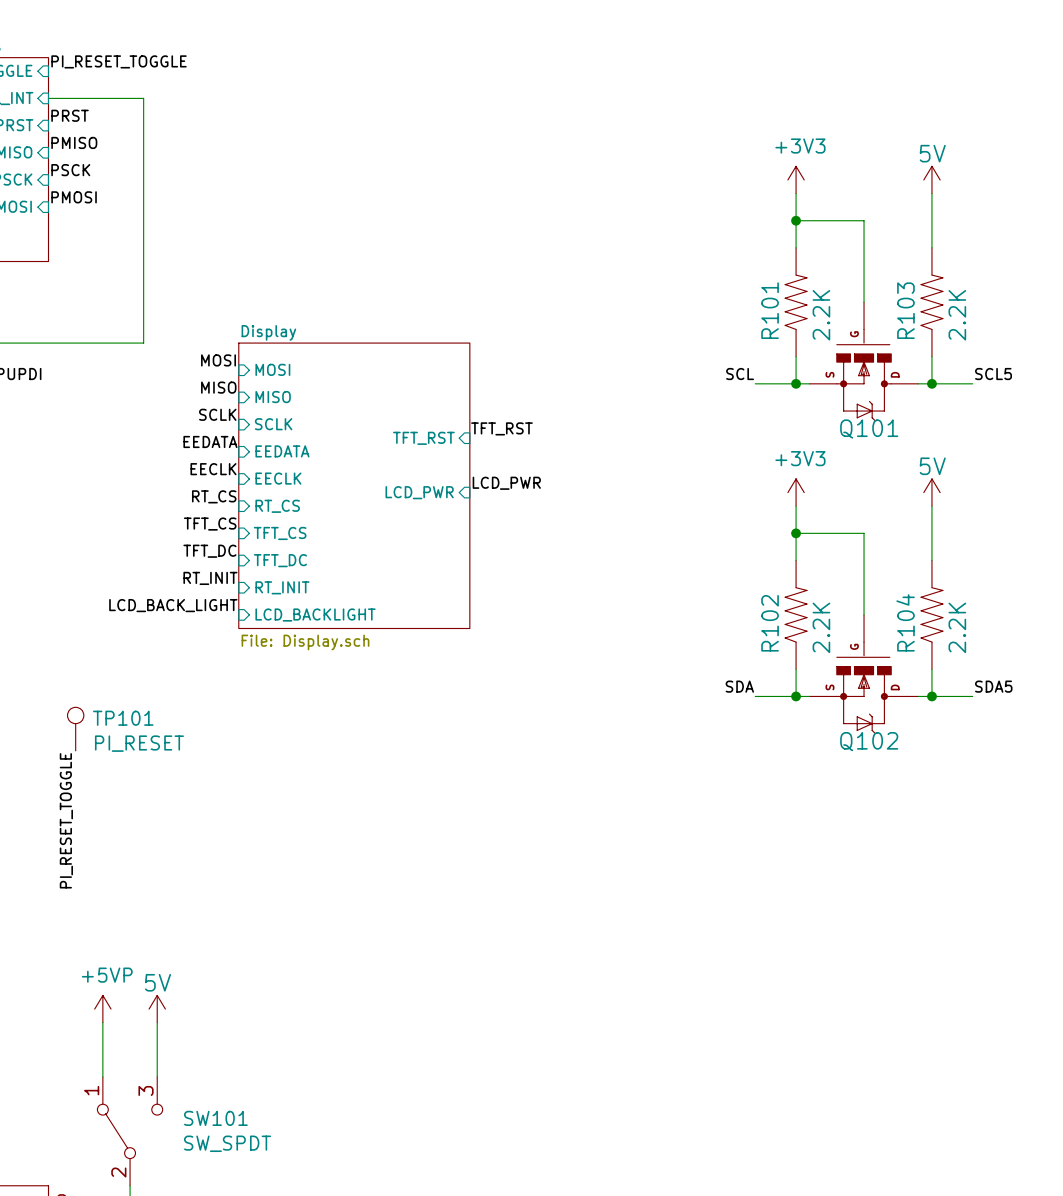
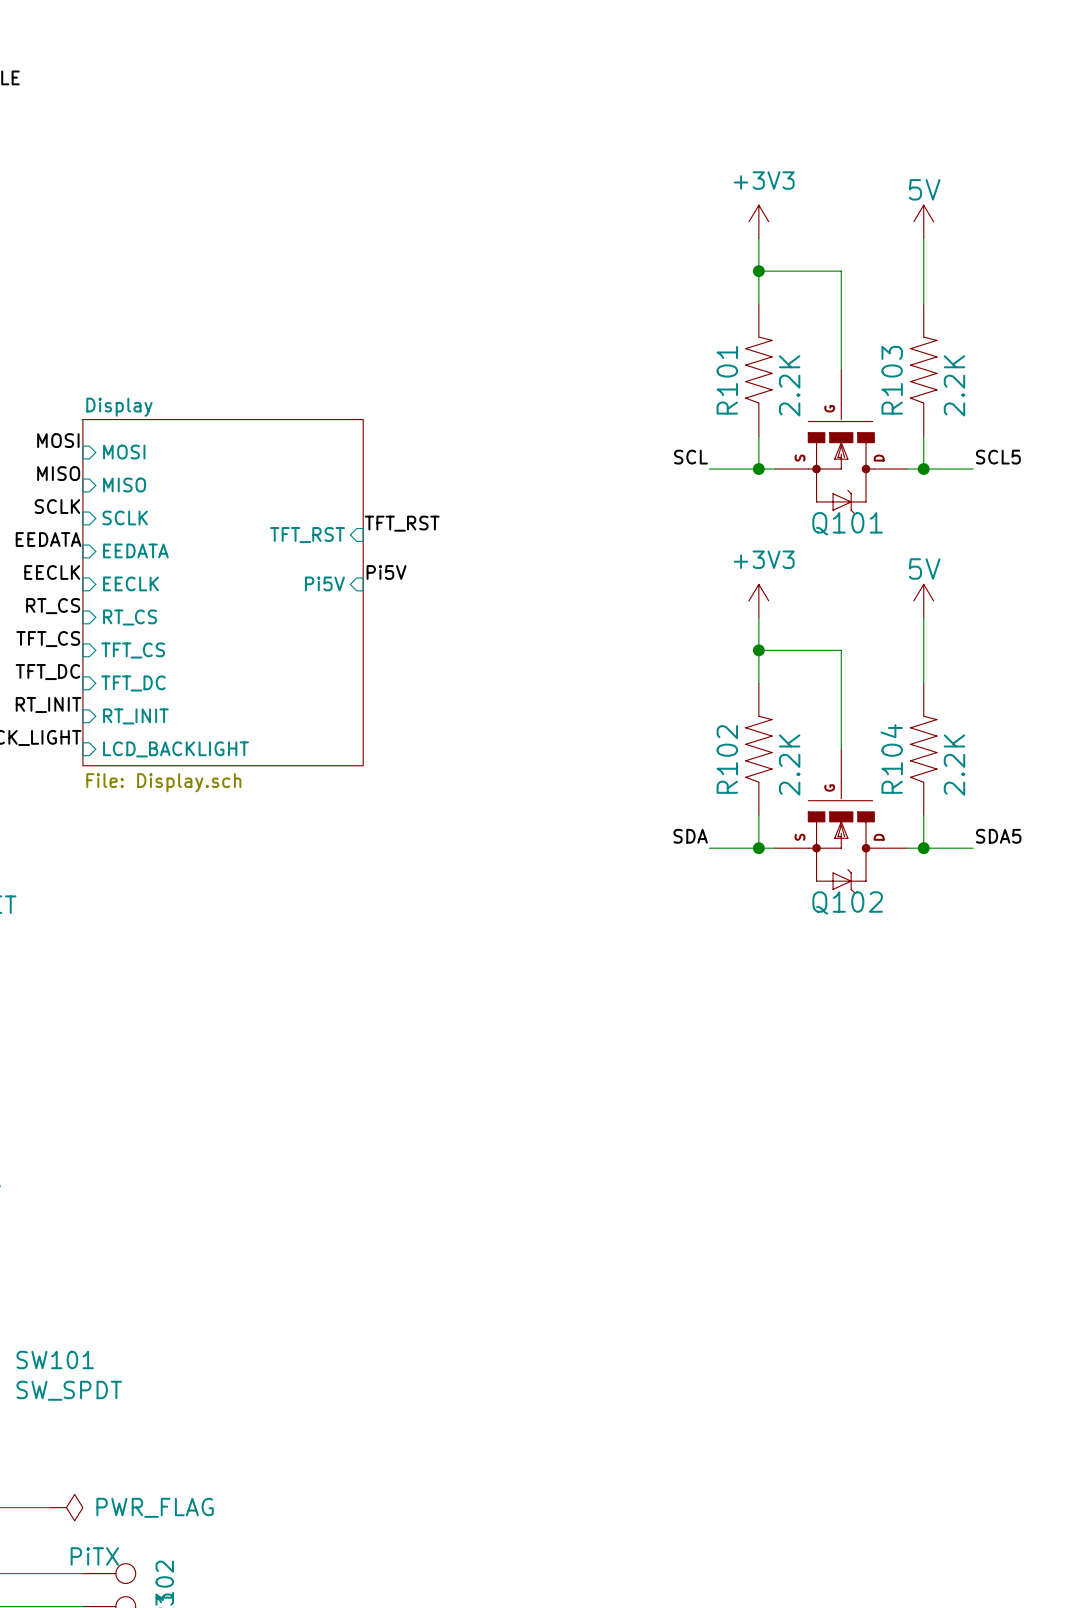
label: none -> Pi5V (386, 572)
sheet pin: none -> Pi5V (324, 583)
label: LCD_PWR (506, 483) -> none
sheet pin: LCD_PWR (419, 492) -> none

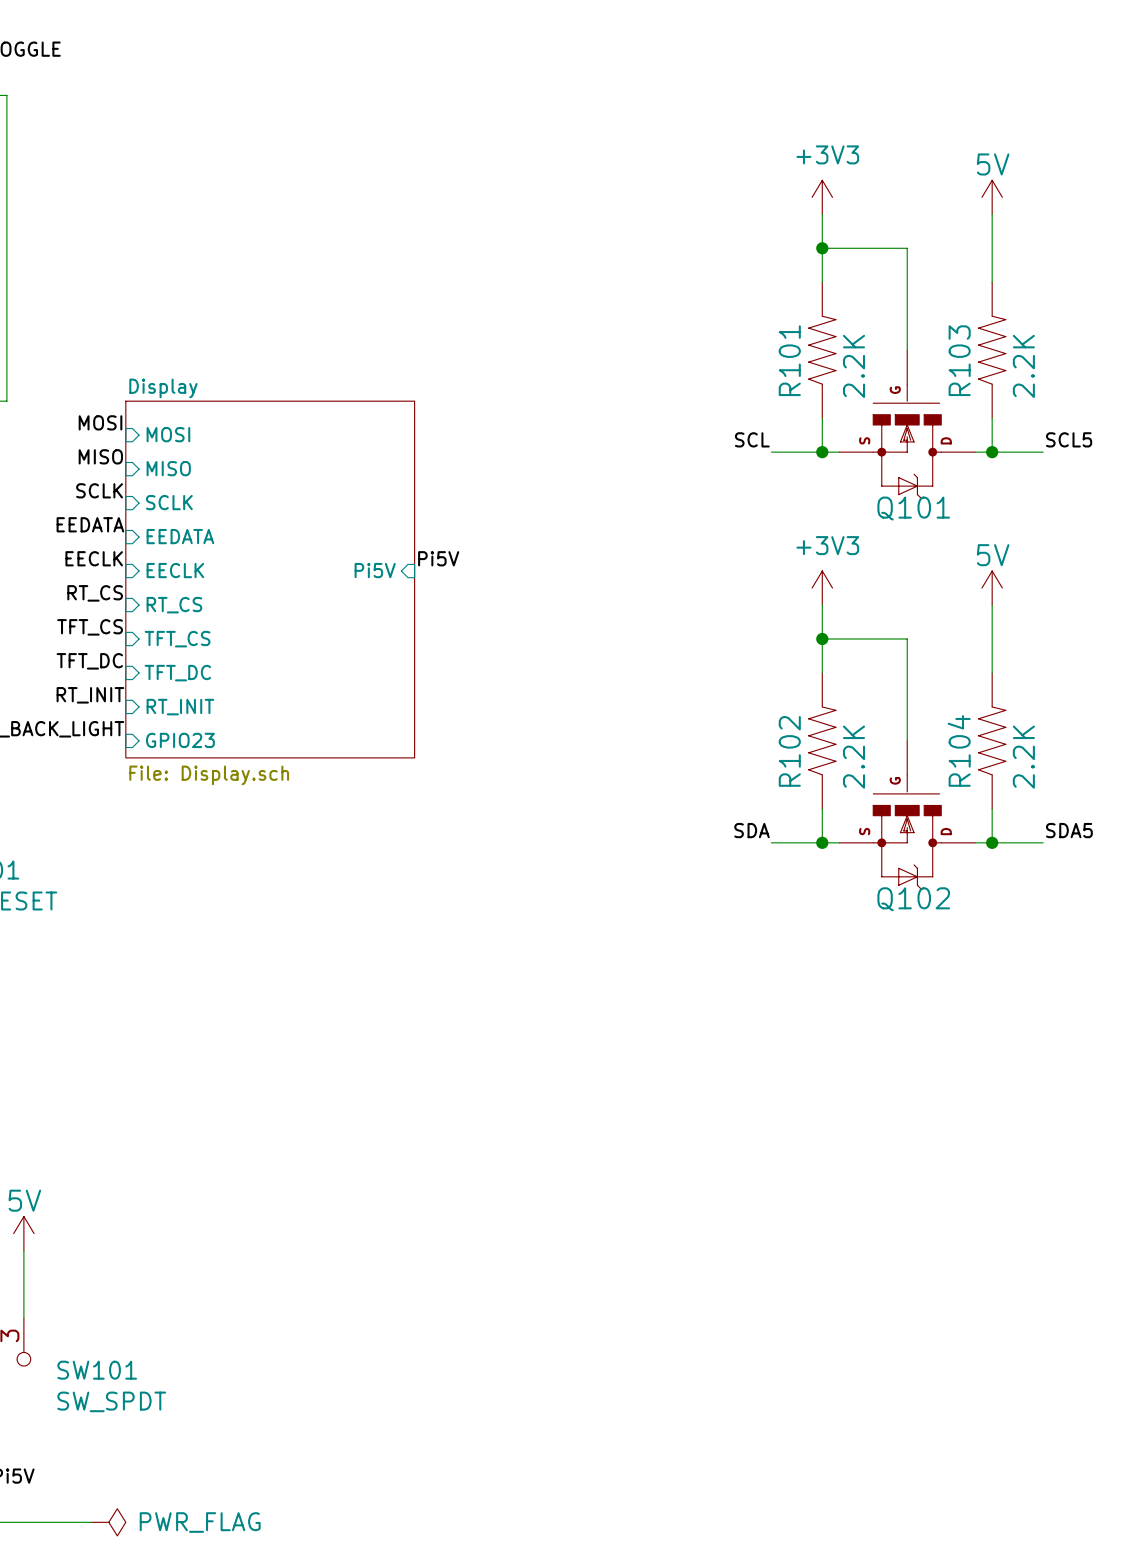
label: TFT_RST (402, 523) -> none
sheet pin: TFT_RST (307, 535) -> none
sheet pin: LCD_BACKLIGHT (176, 749) -> GPIO23 (180, 740)

